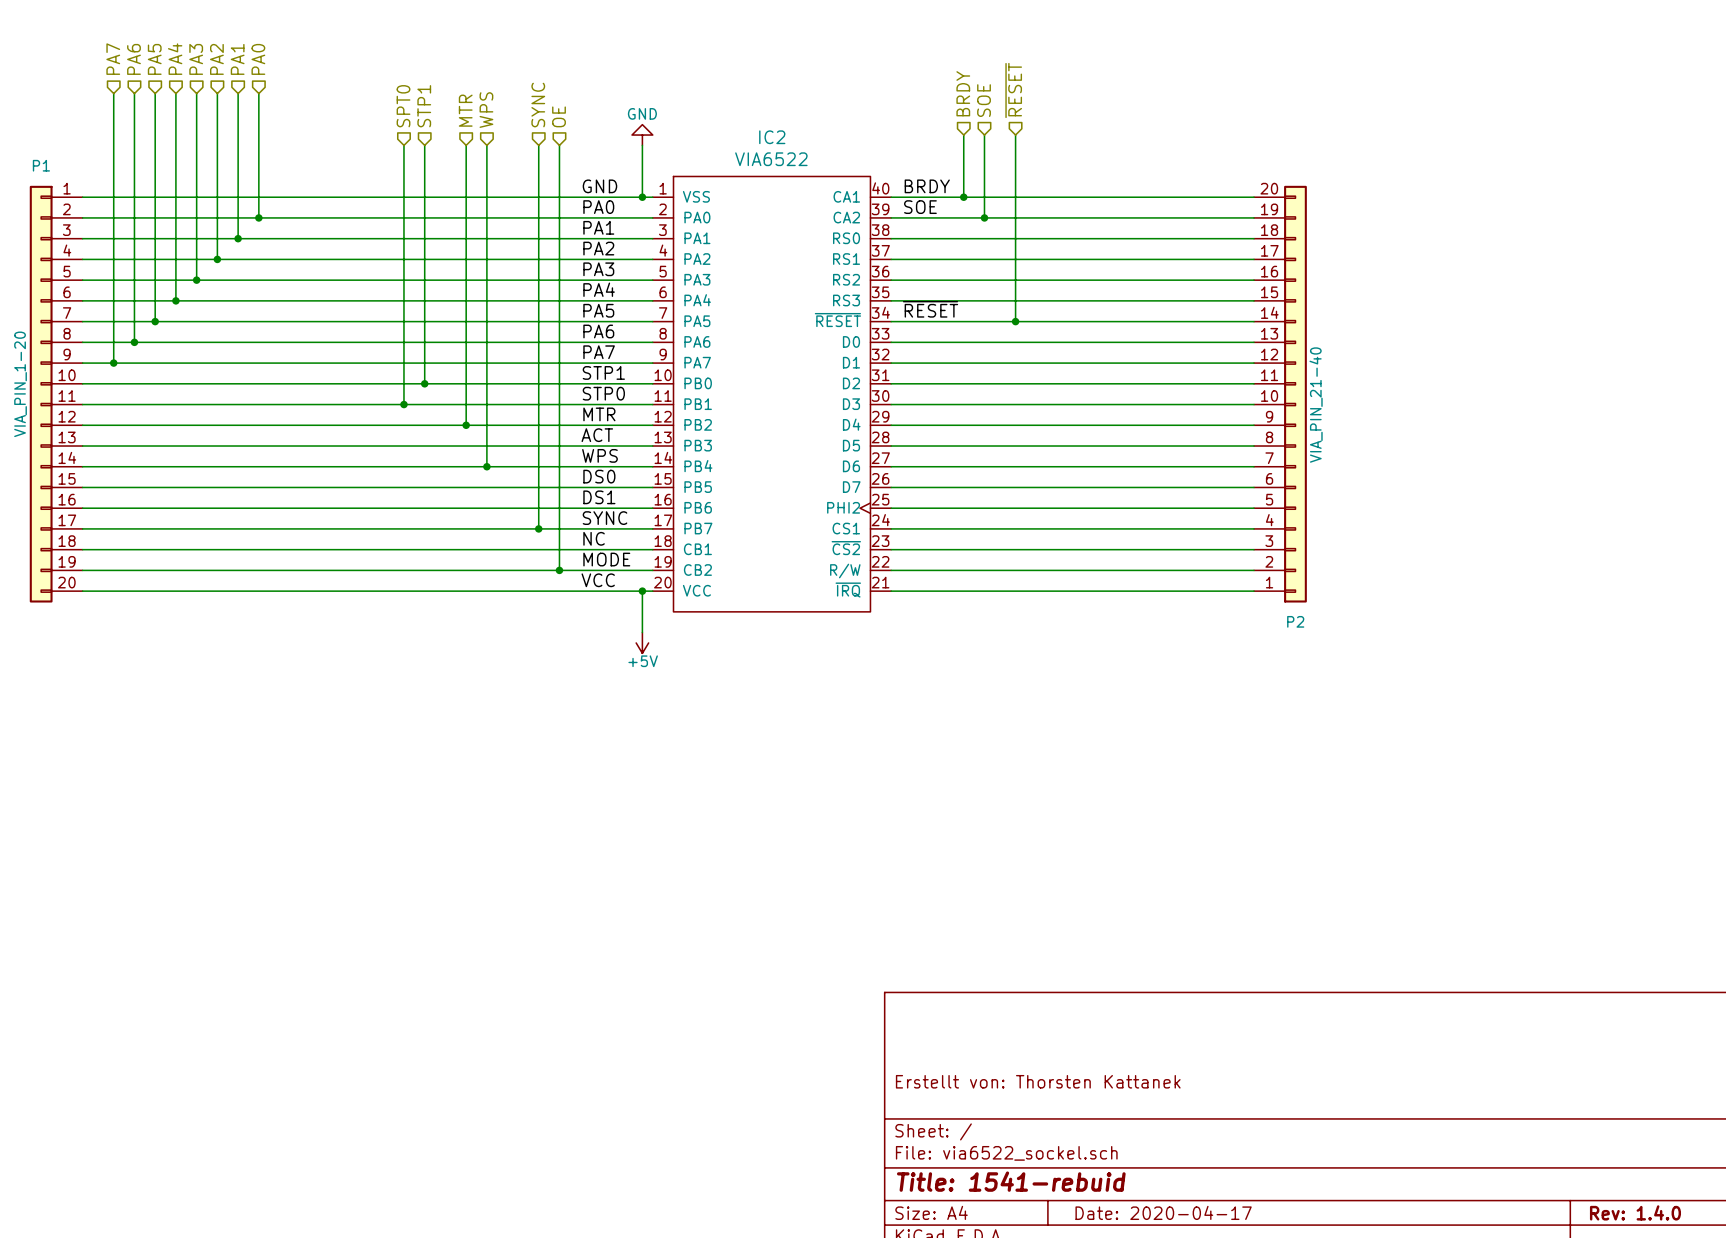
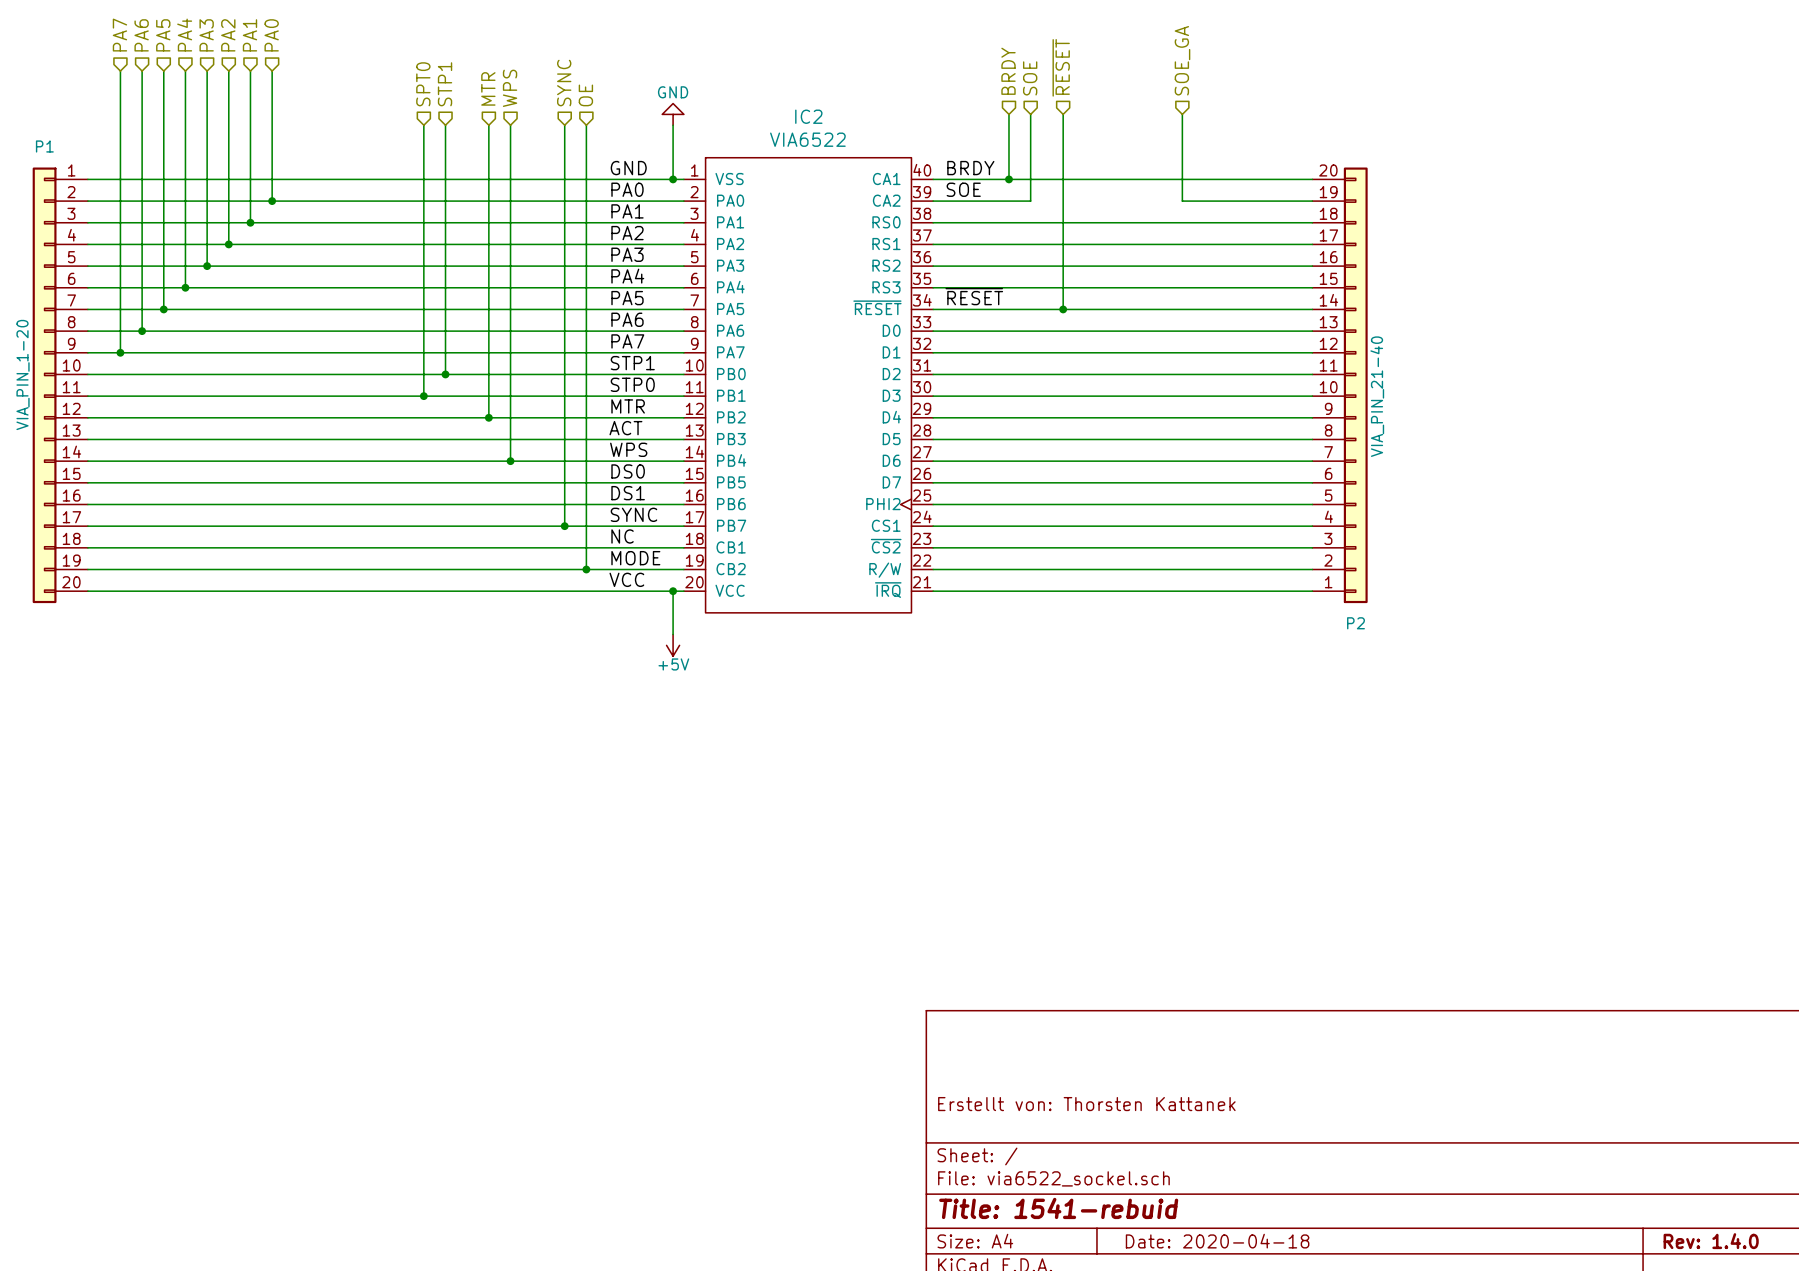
hierarchical label: none -> SOE_GA (1182, 60)
wire: (984, 217) (1129, 217) -> (1182, 114) (1182, 201)
junction: (984, 217) -> none
title block: Date: 2020-04-17 (1163, 1212) -> Date: 2020-04-18 (1217, 1241)

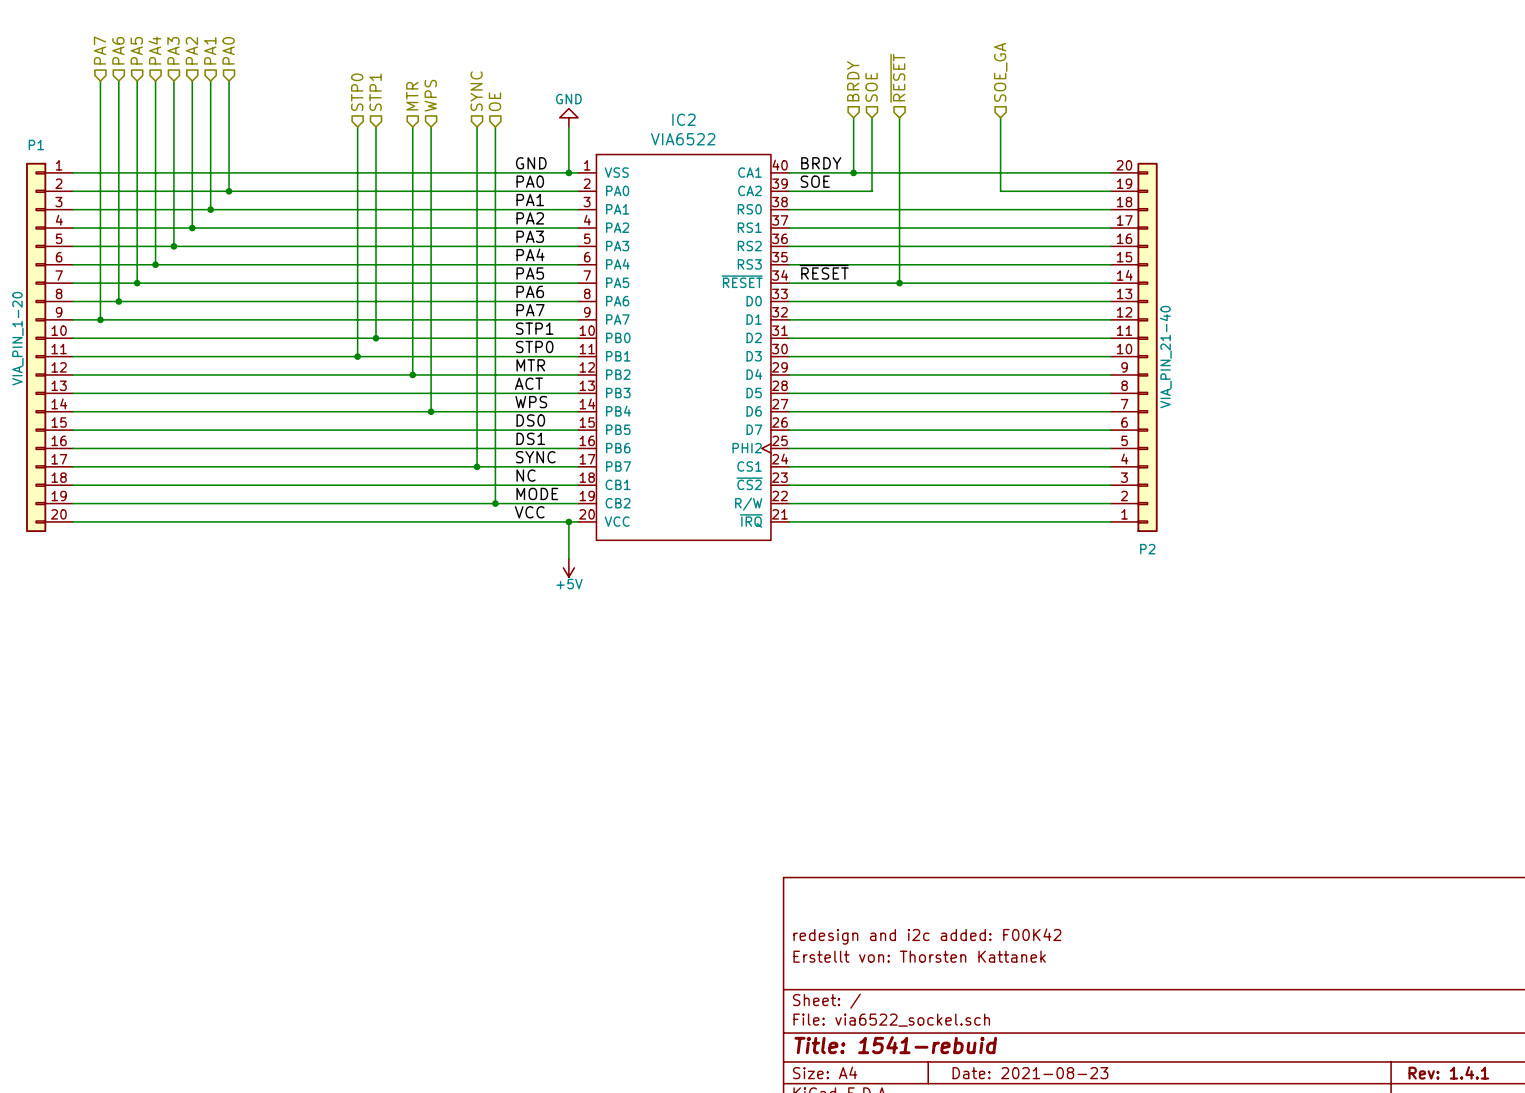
hierarchical label: SPT0 (423, 84) -> STP0 (357, 92)
title block: none -> redesign and i2c added: F00K42 (927, 936)
title block: Date: 2020-04-18 (1217, 1241) -> Date: 2021-08-23 (1030, 1073)
title block: Rev: 1.4.0 (1711, 1241) -> Rev: 1.4.1 (1448, 1072)

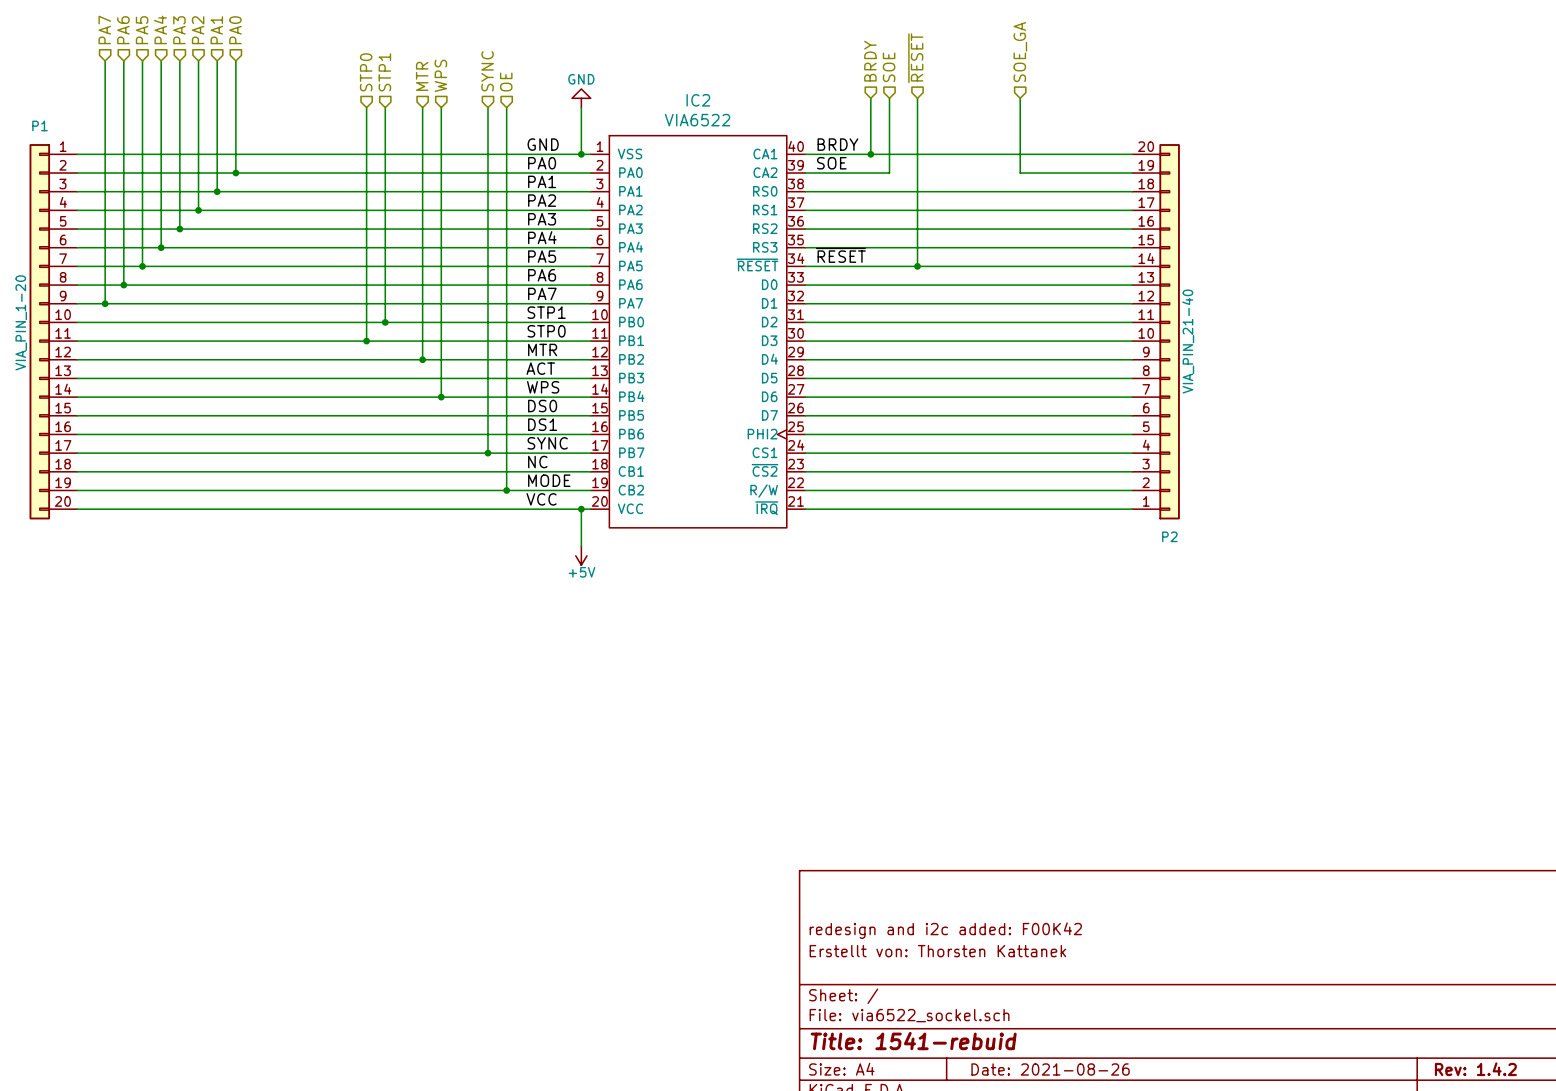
title block: Rev: 1.4.1 (1448, 1072) -> Rev: 1.4.2 (1475, 1069)
title block: Date: 2021-08-23 (1030, 1073) -> Date: 2021-08-26 (1050, 1069)

